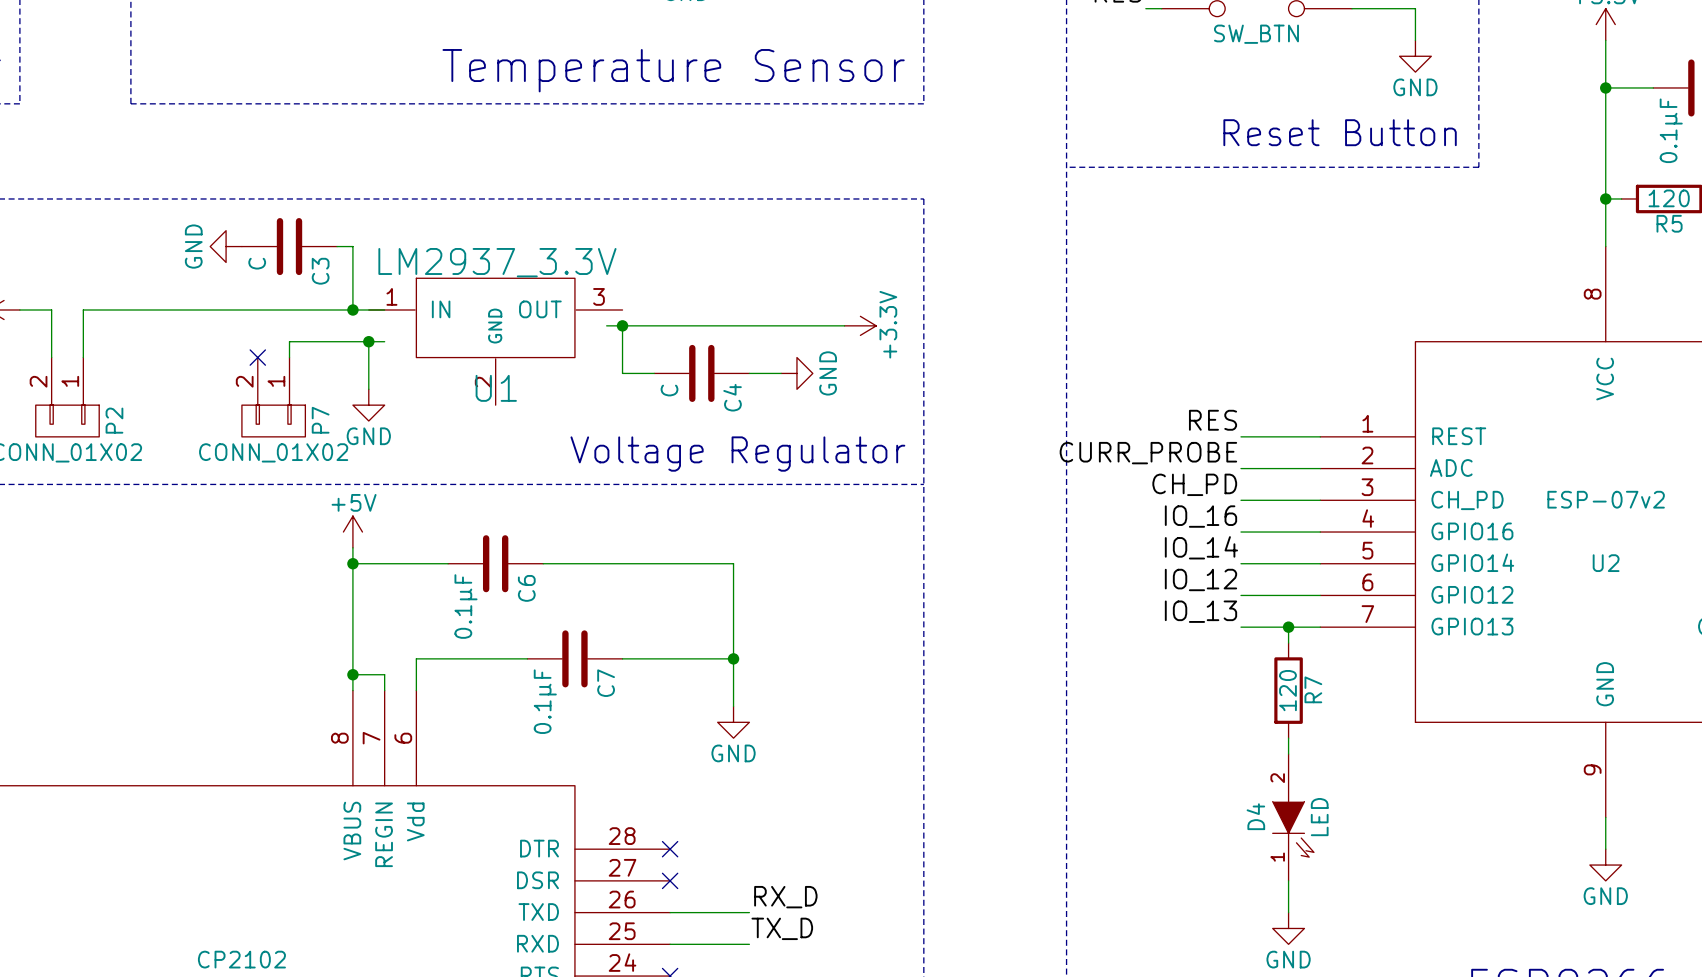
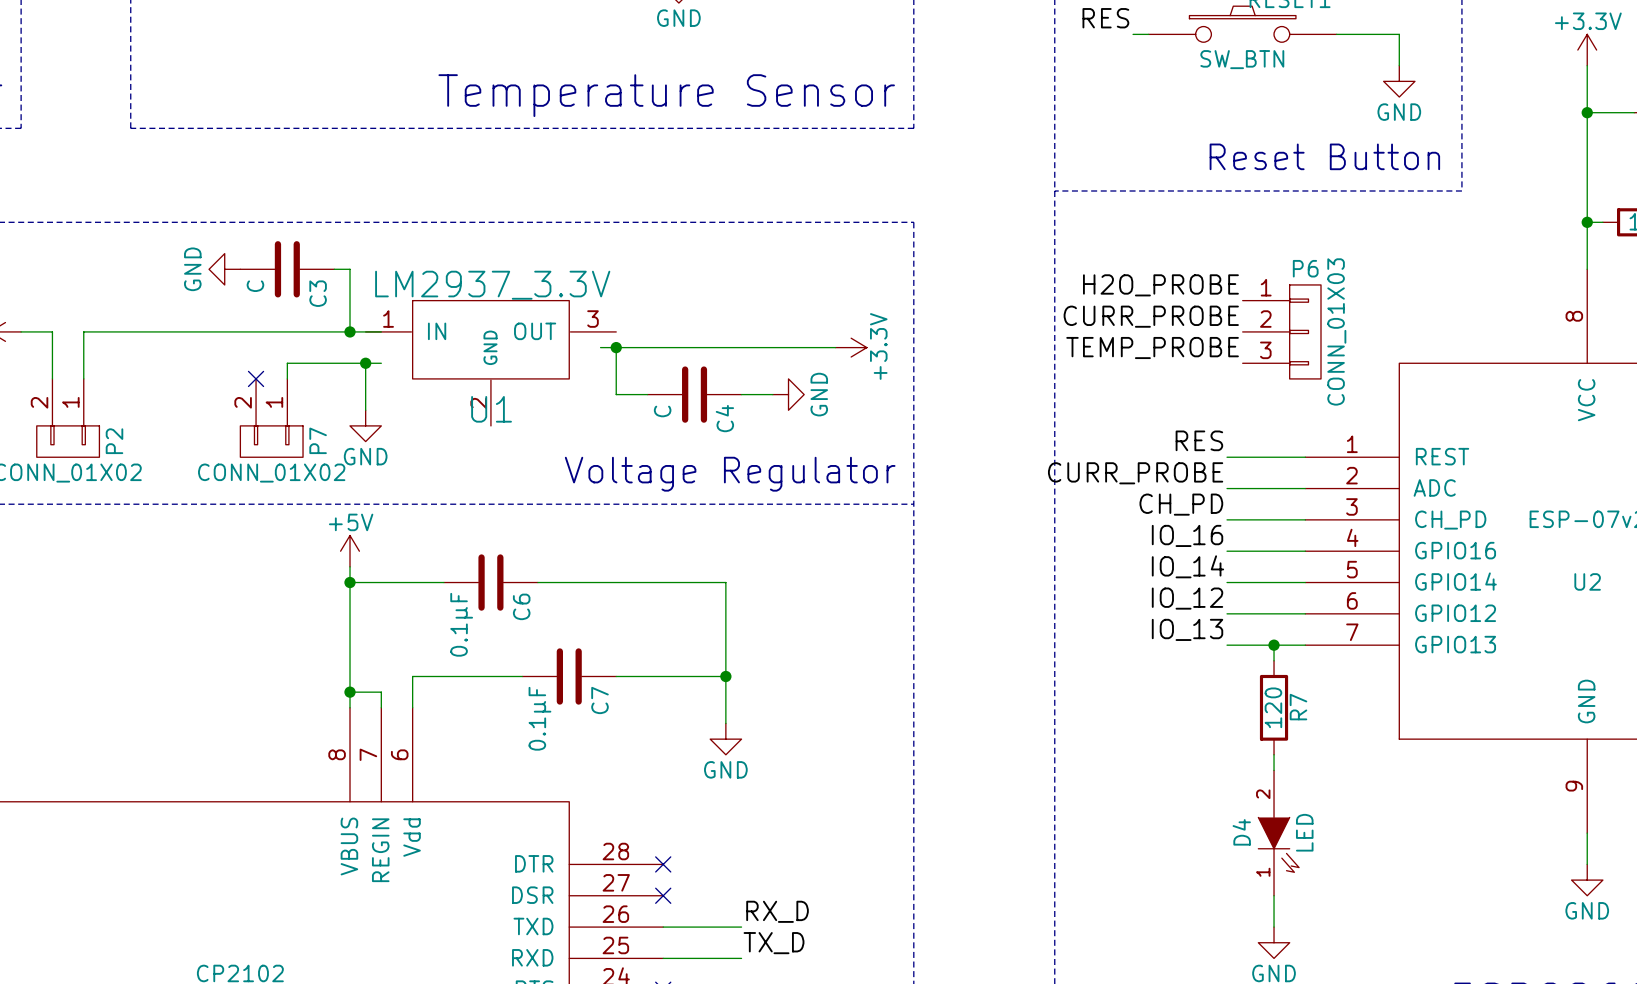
label: none -> H2O_PROBE (1160, 285)
label: none -> CURR_PROBE (1151, 316)
P6: none -> CONN_01X03 (1281, 331)
label: none -> TEMP_PROBE (1152, 347)

